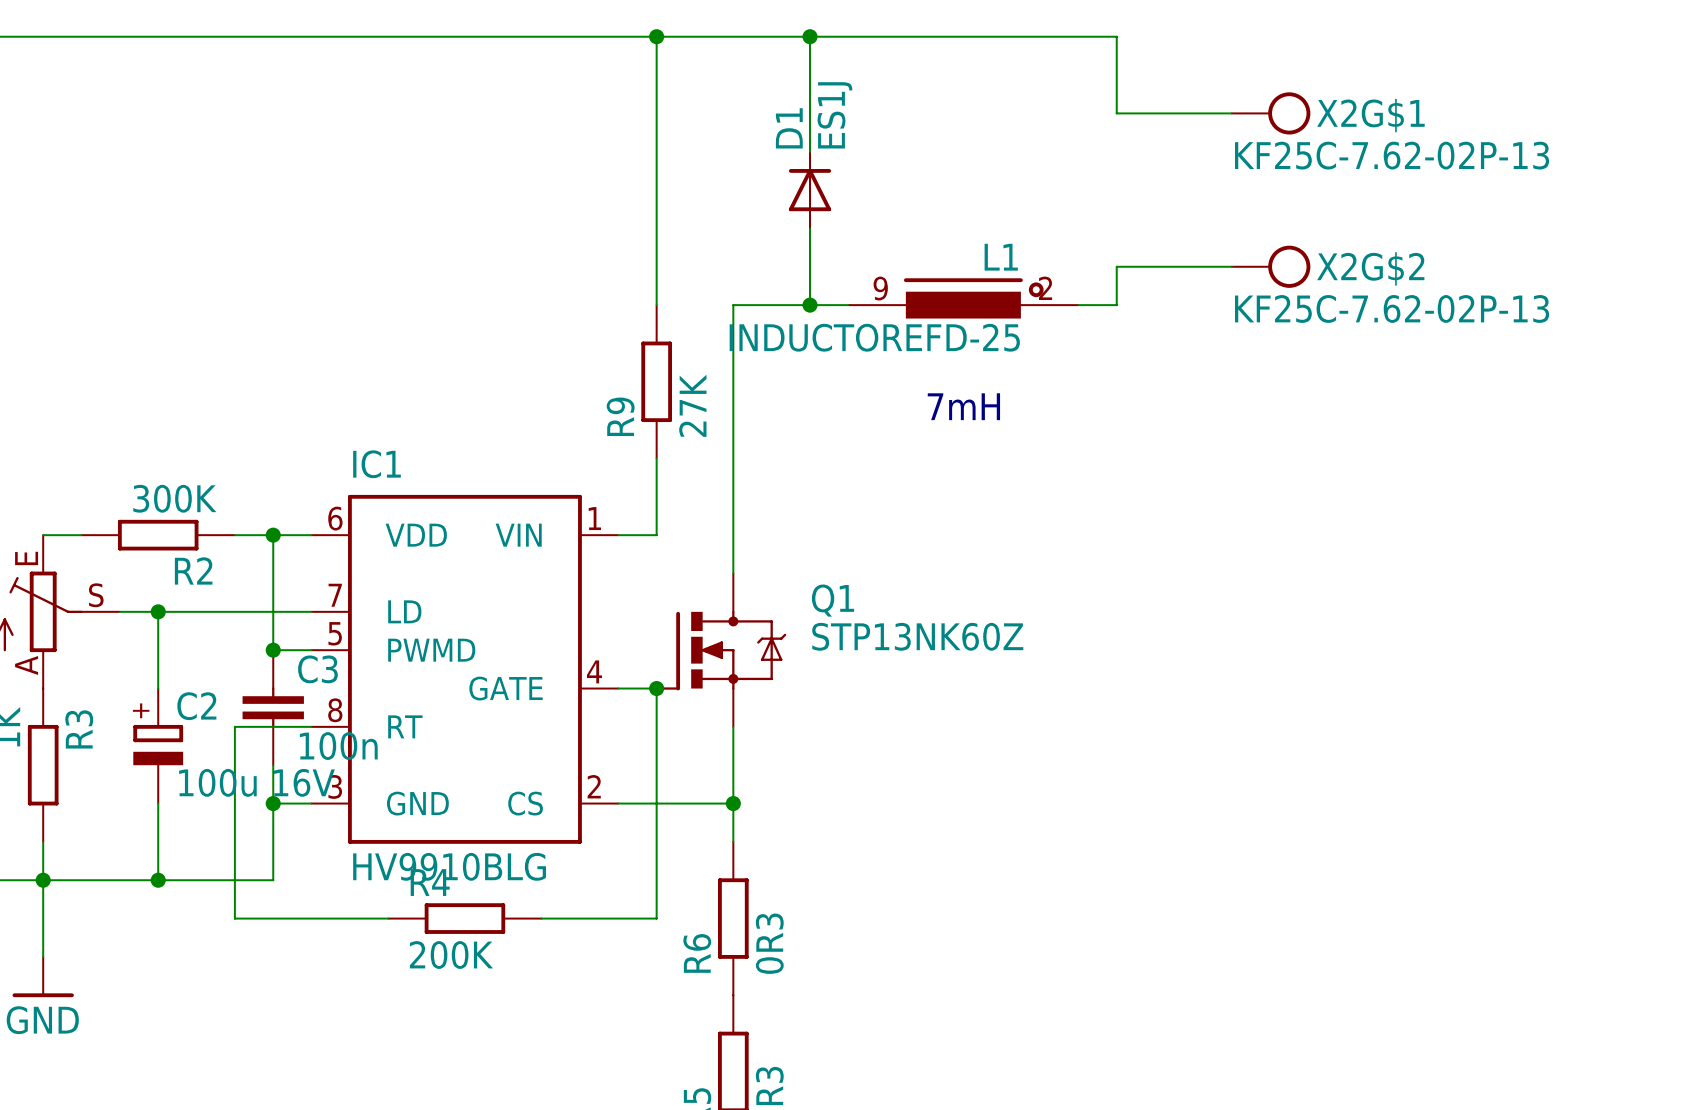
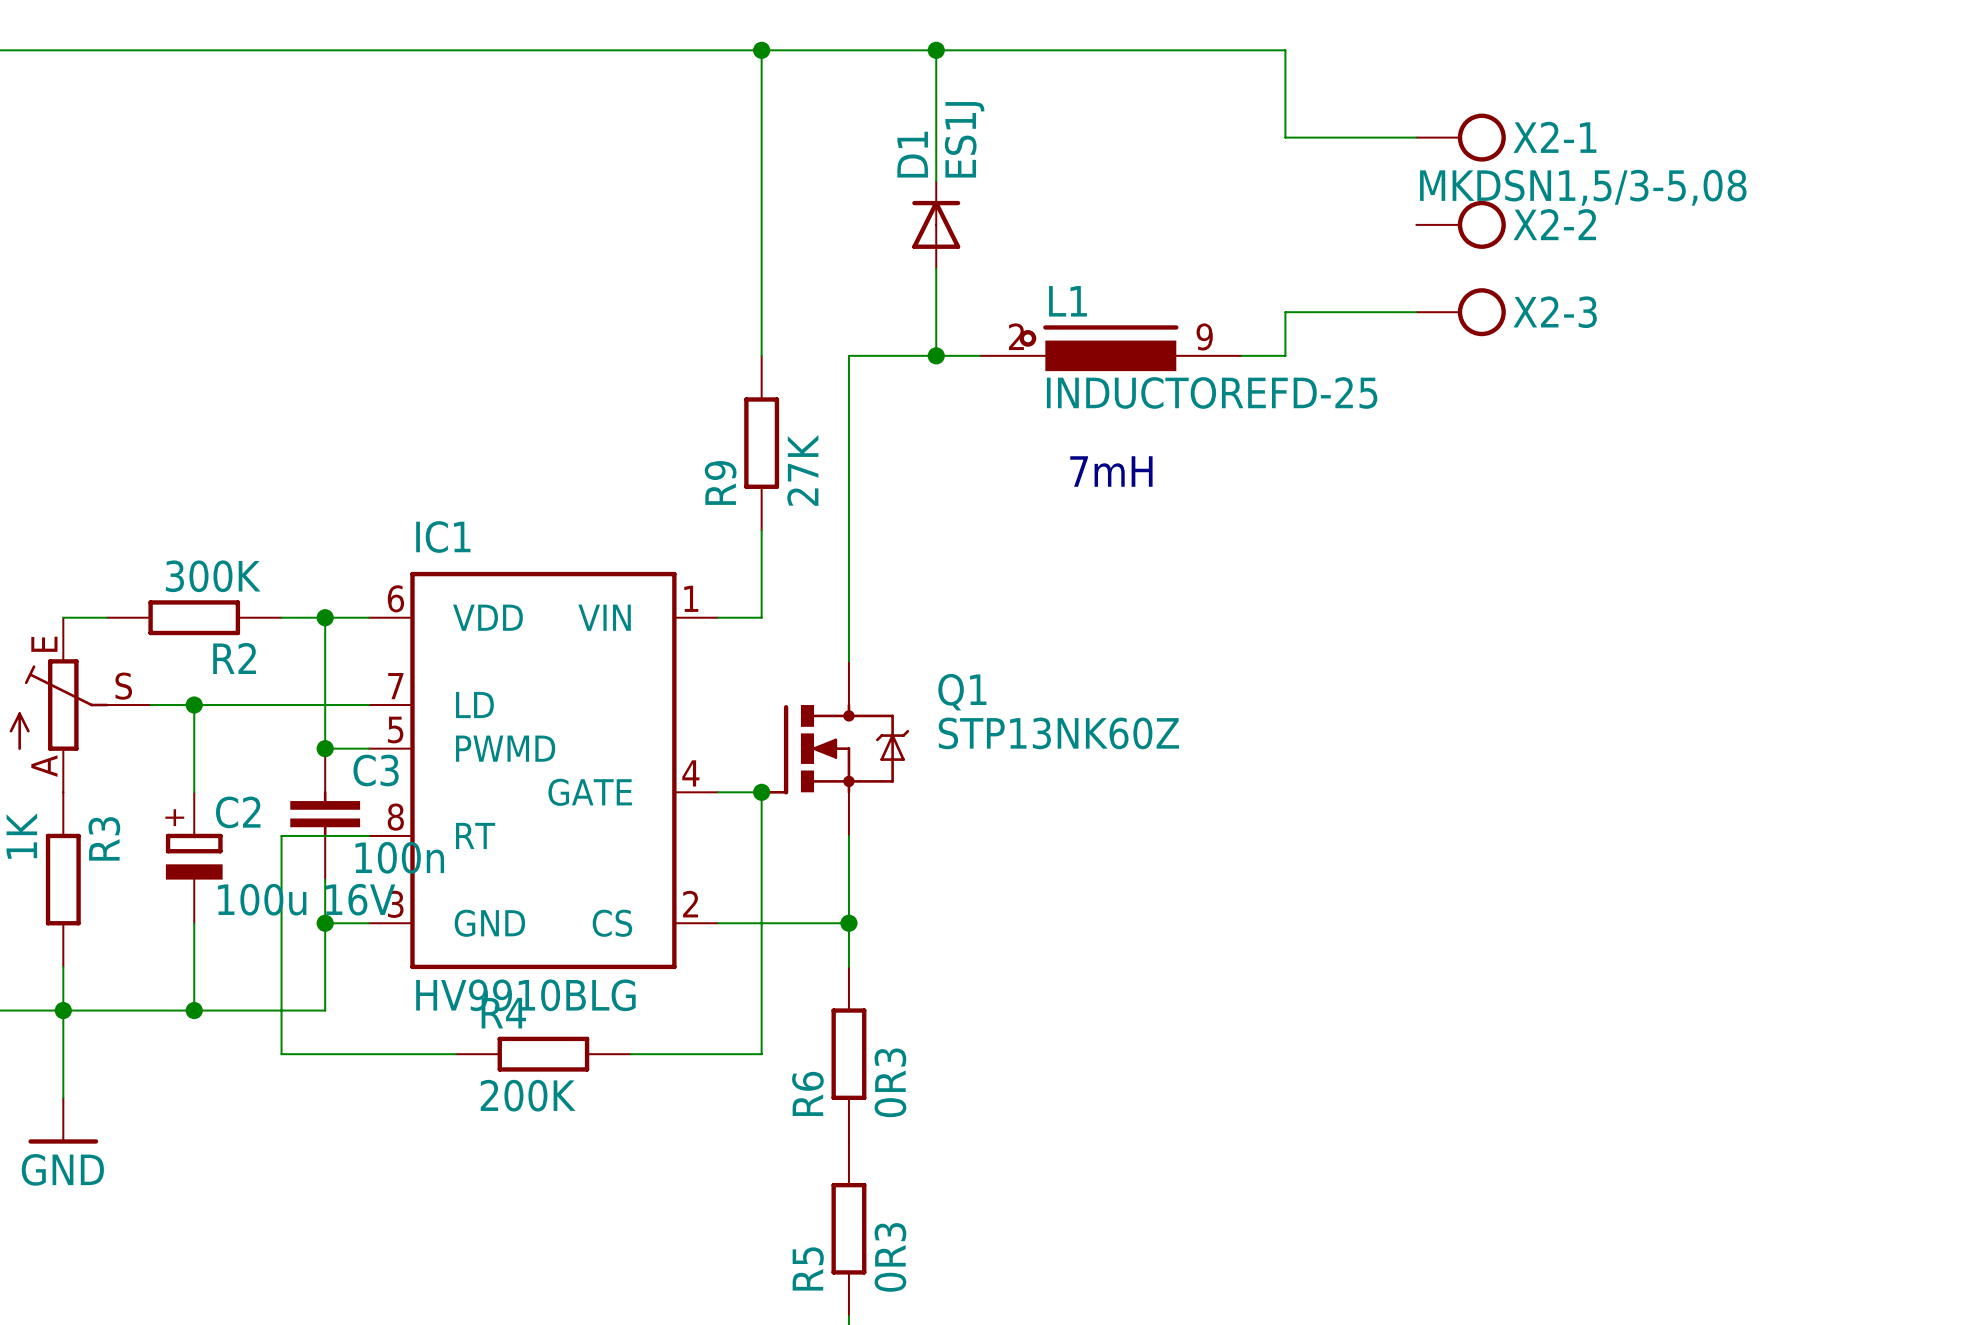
X2G$1 name: X2G$1 (1370, 115) -> X2-1 (1554, 137)
X2G$1 value: KF25C-7.62-02P-13 (1392, 155) -> MKDSN1,5/3-5,08 (1583, 187)
X2-2: none -> (1461, 224)
X2G$2 name: X2G$2 (1370, 268) -> X2-3 (1555, 312)
L1 flip: as is (973, 298) -> left-right (1099, 348)
X2G$2 value: KF25C-7.62-02P-13 (1392, 308) -> none

